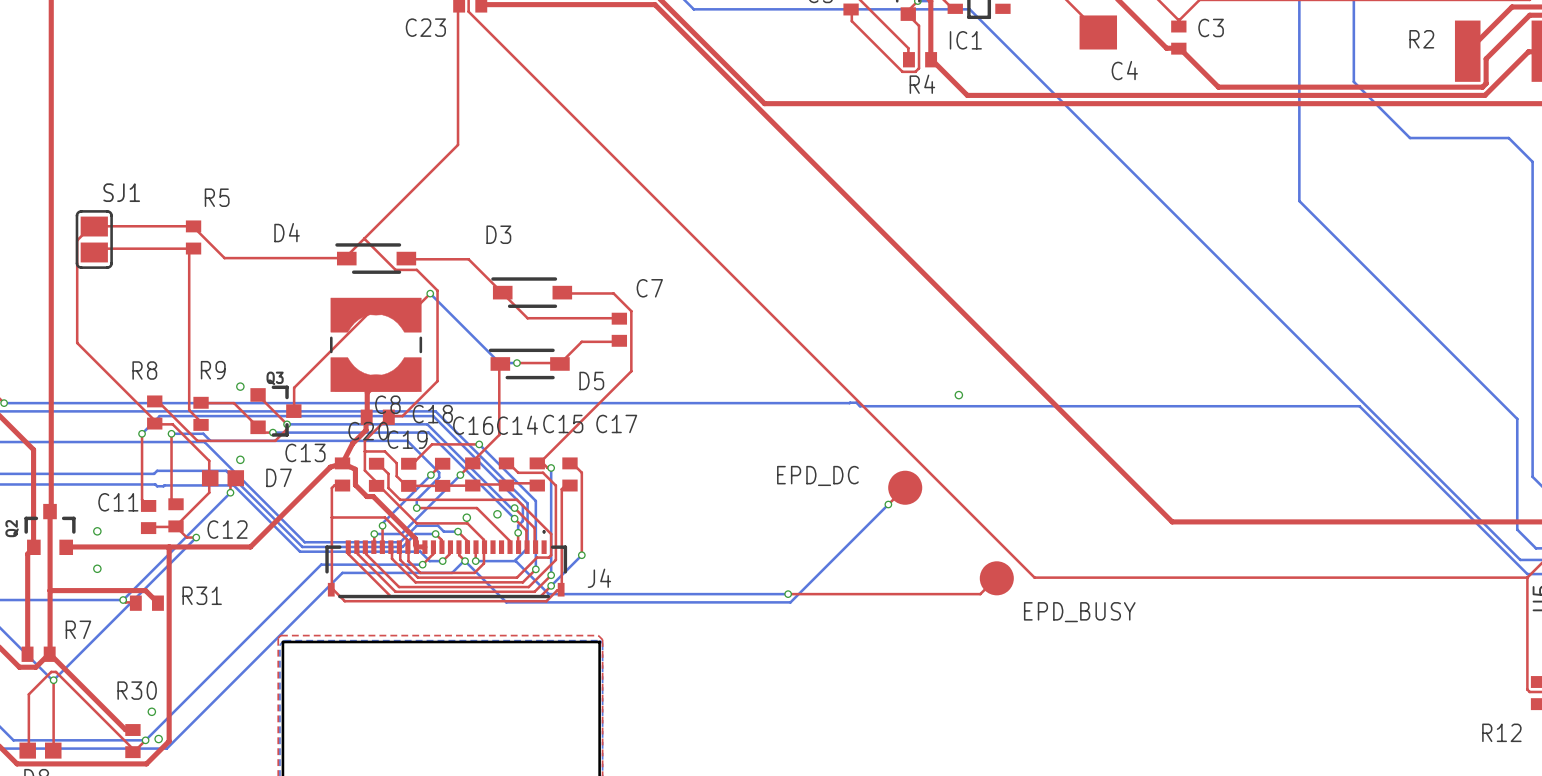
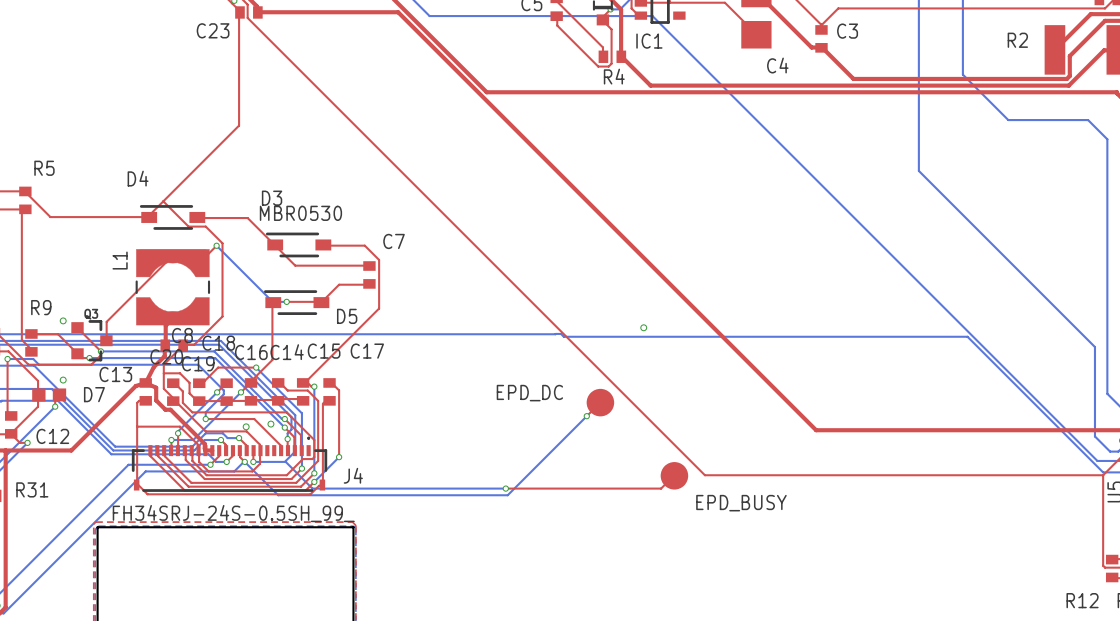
D4 name position: D4 (287, 232) -> D4 (138, 178)
D3 value: none -> MBR0530 (300, 213)
L1 name: none -> L1 (120, 260)
J4 value: none -> FH34SRJ-24S-0.5SH_99_ (233, 513)

